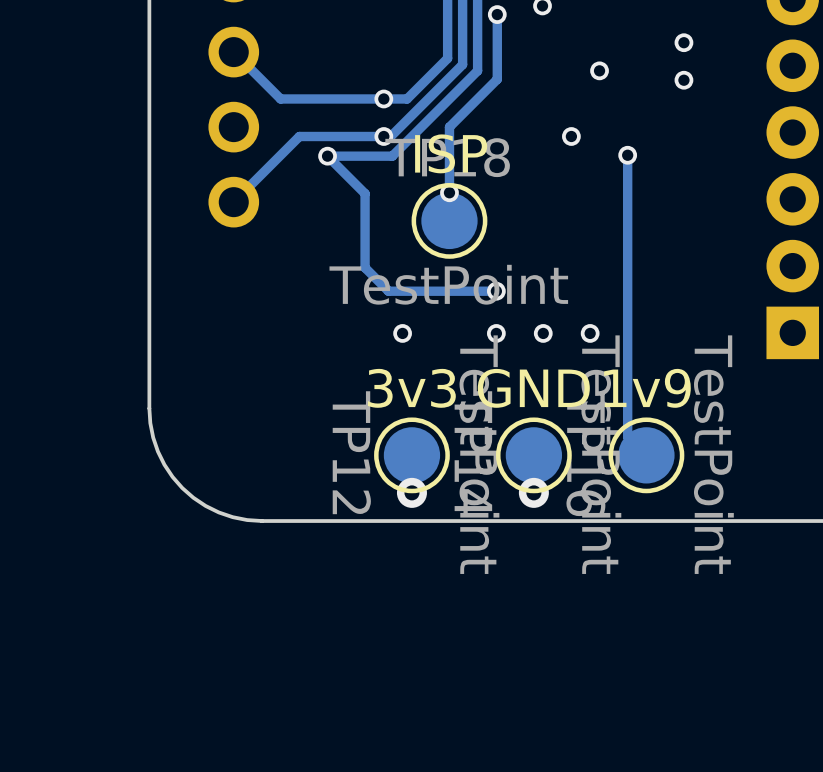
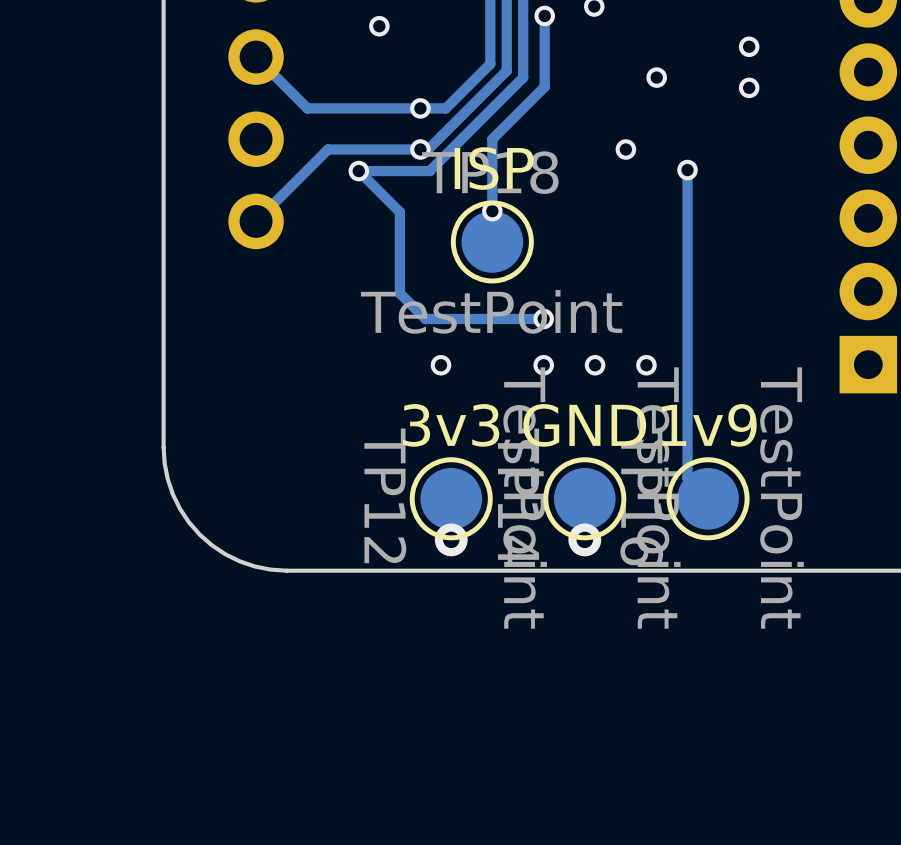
via: none -> (379, 26)

